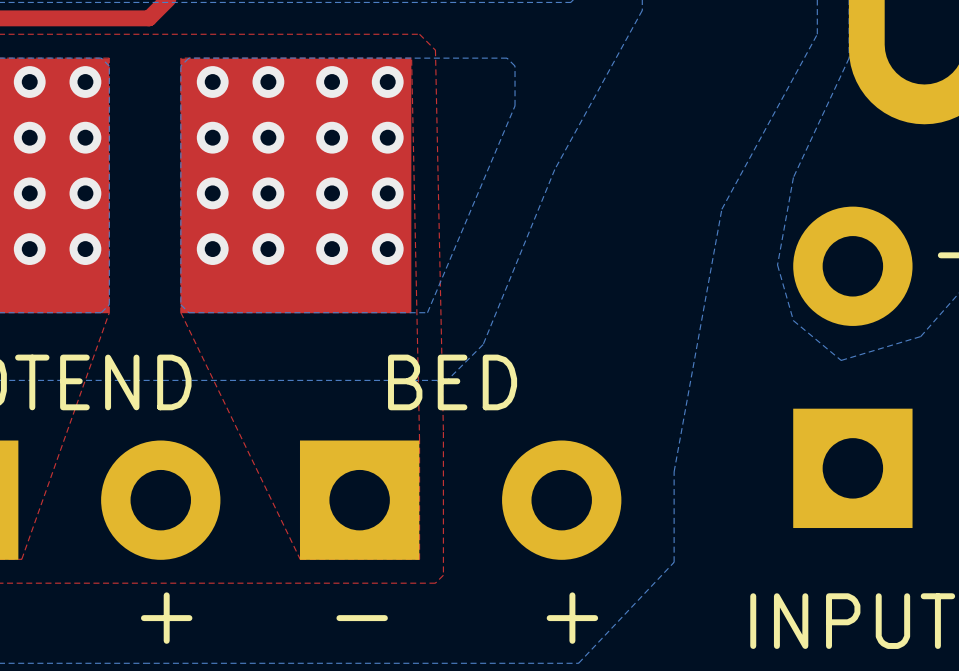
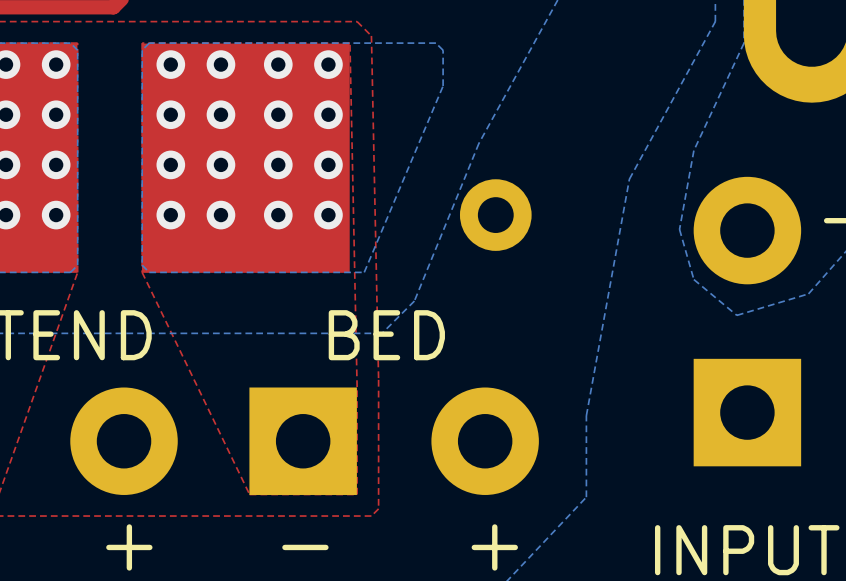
part: none -> (495, 215)

